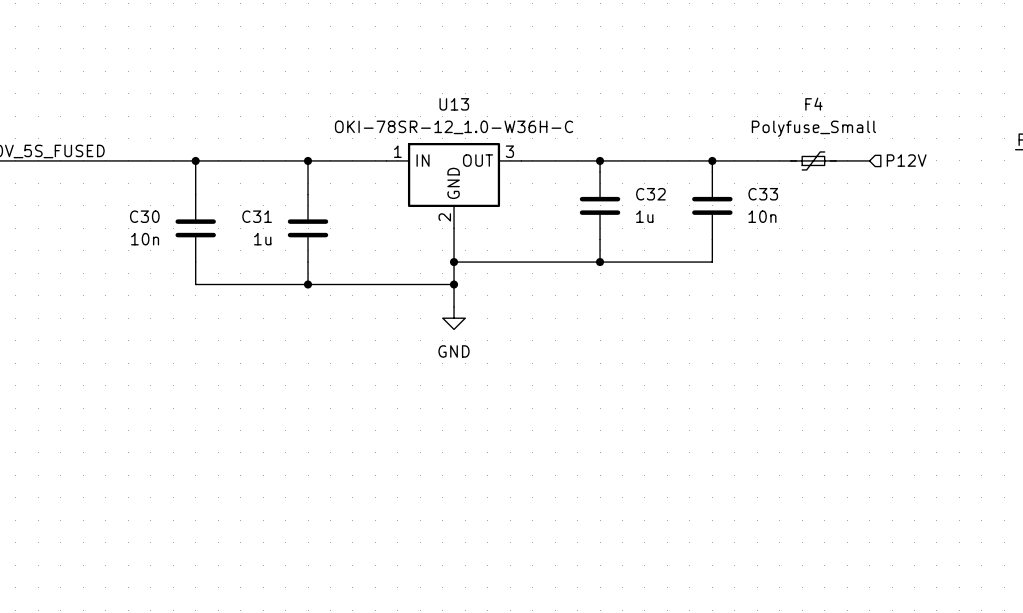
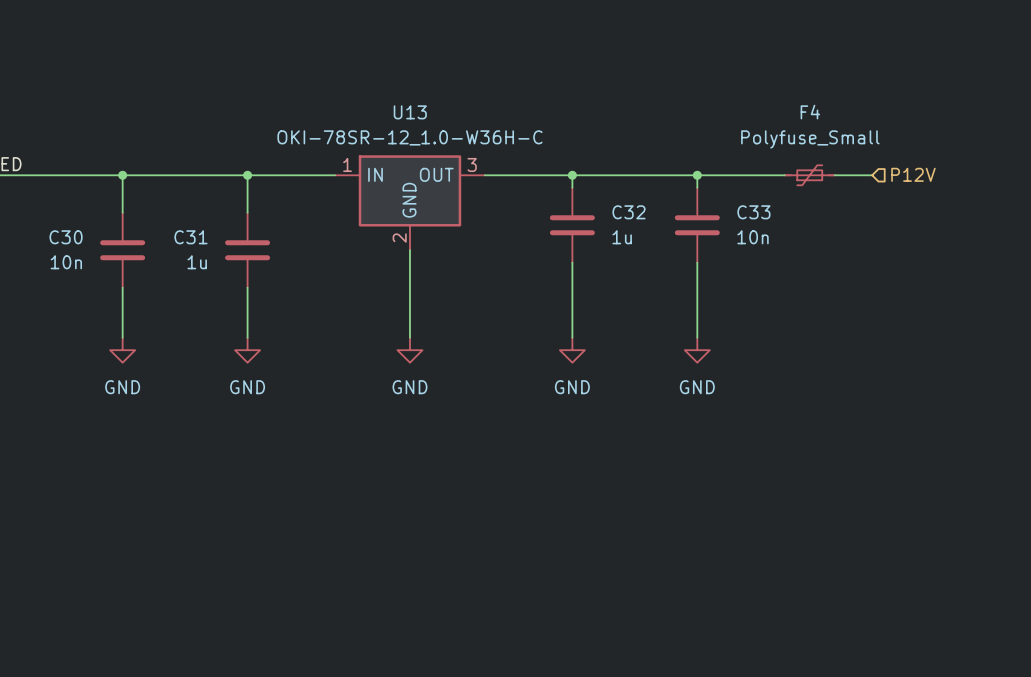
wire: (454, 262) (712, 262) -> (697, 337) (697, 287)
junction: (454, 262) -> none
wire: none -> (572, 287) (572, 337)
junction: (600, 262) -> none
wire: (195, 284) (454, 284) -> (122, 312) (122, 337)
wire: none -> (247, 312) (247, 337)
junction: (308, 284) -> none
junction: (454, 284) -> none
power symbol: none -> GND (122, 350)
power symbol: none -> GND (247, 350)
power symbol: none -> GND (572, 350)
power symbol: none -> GND (697, 350)

